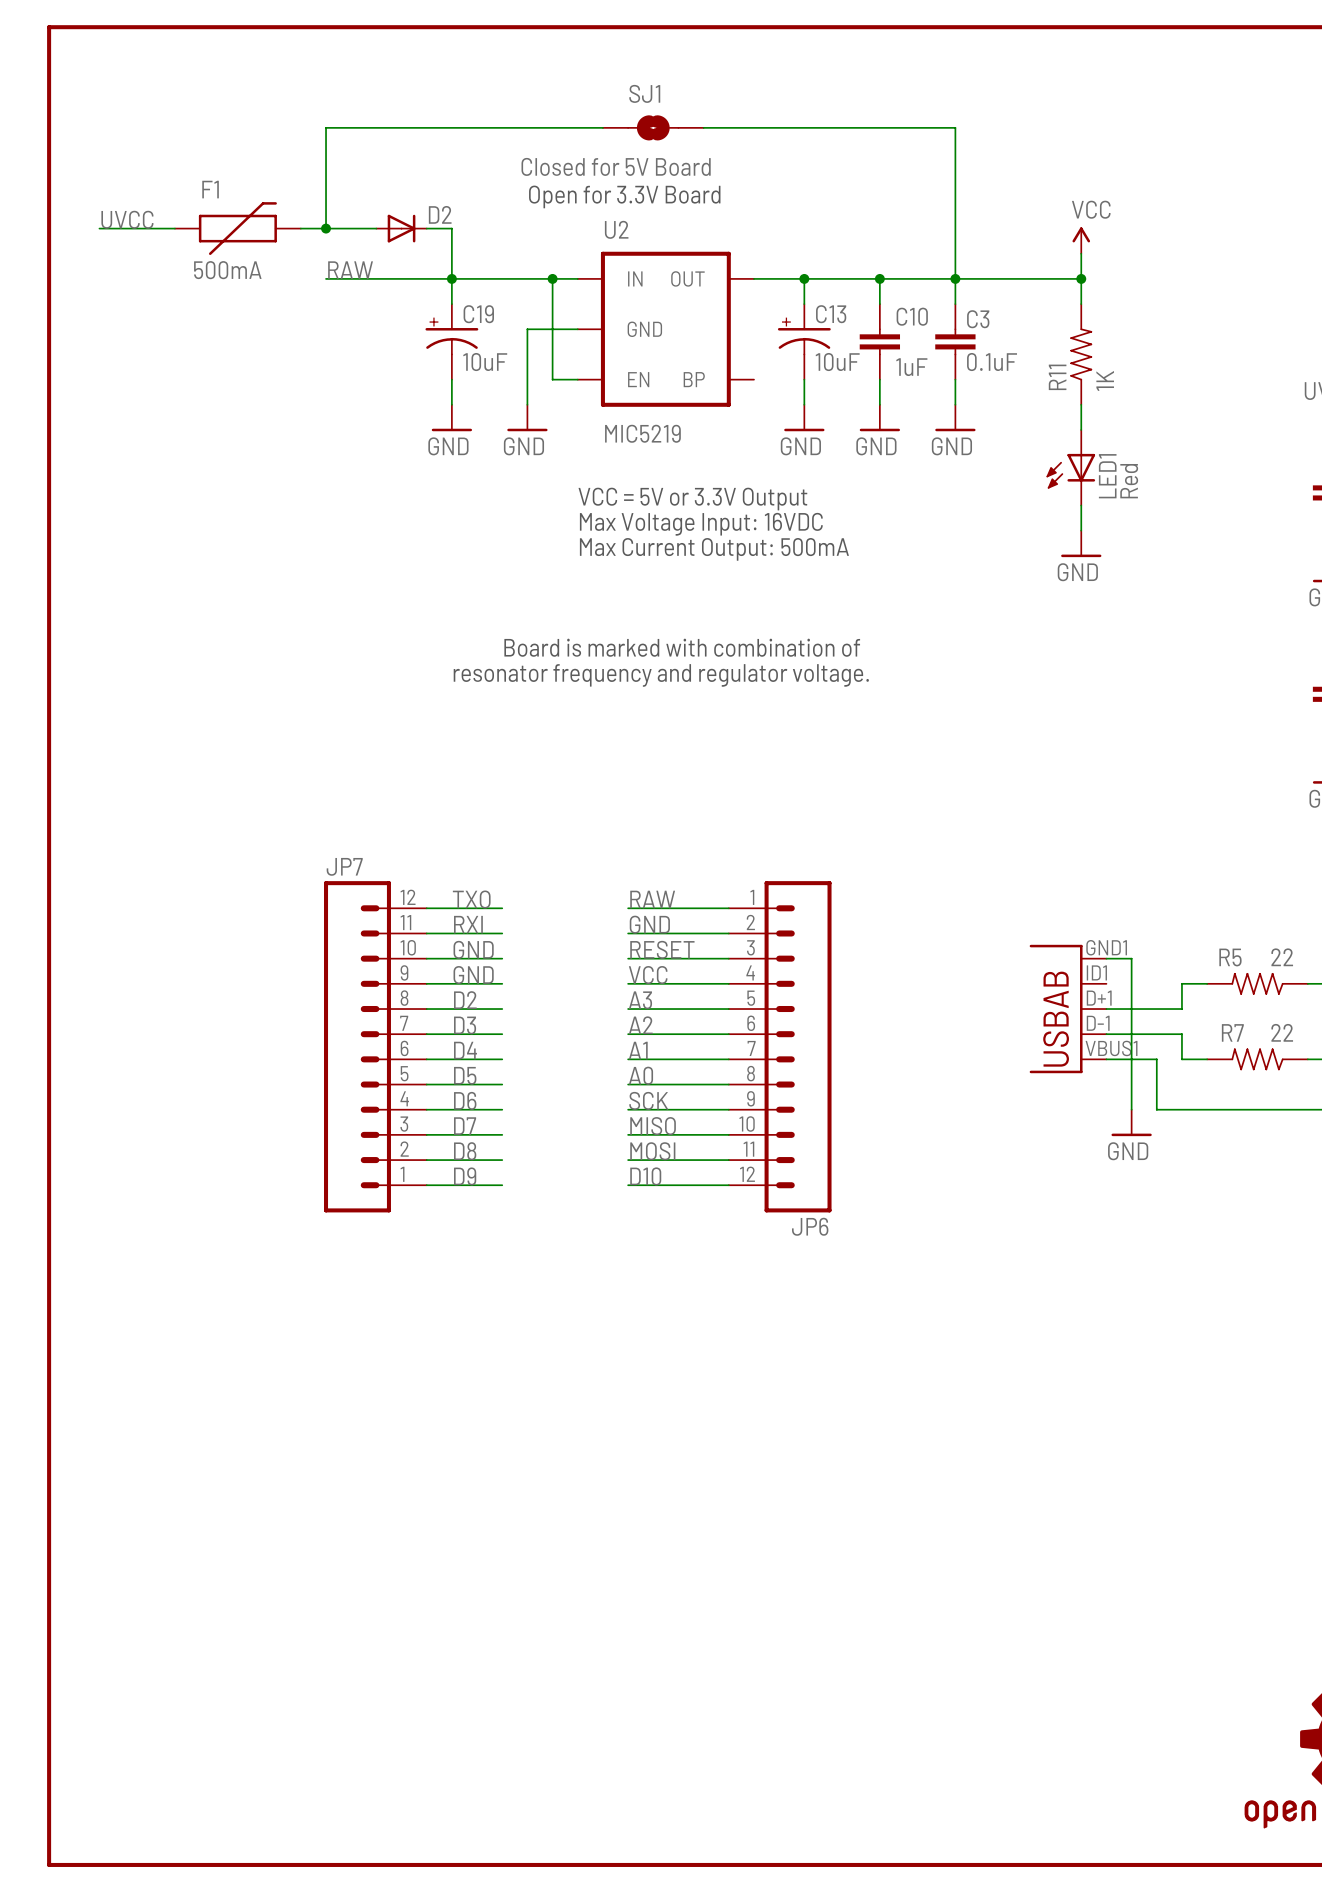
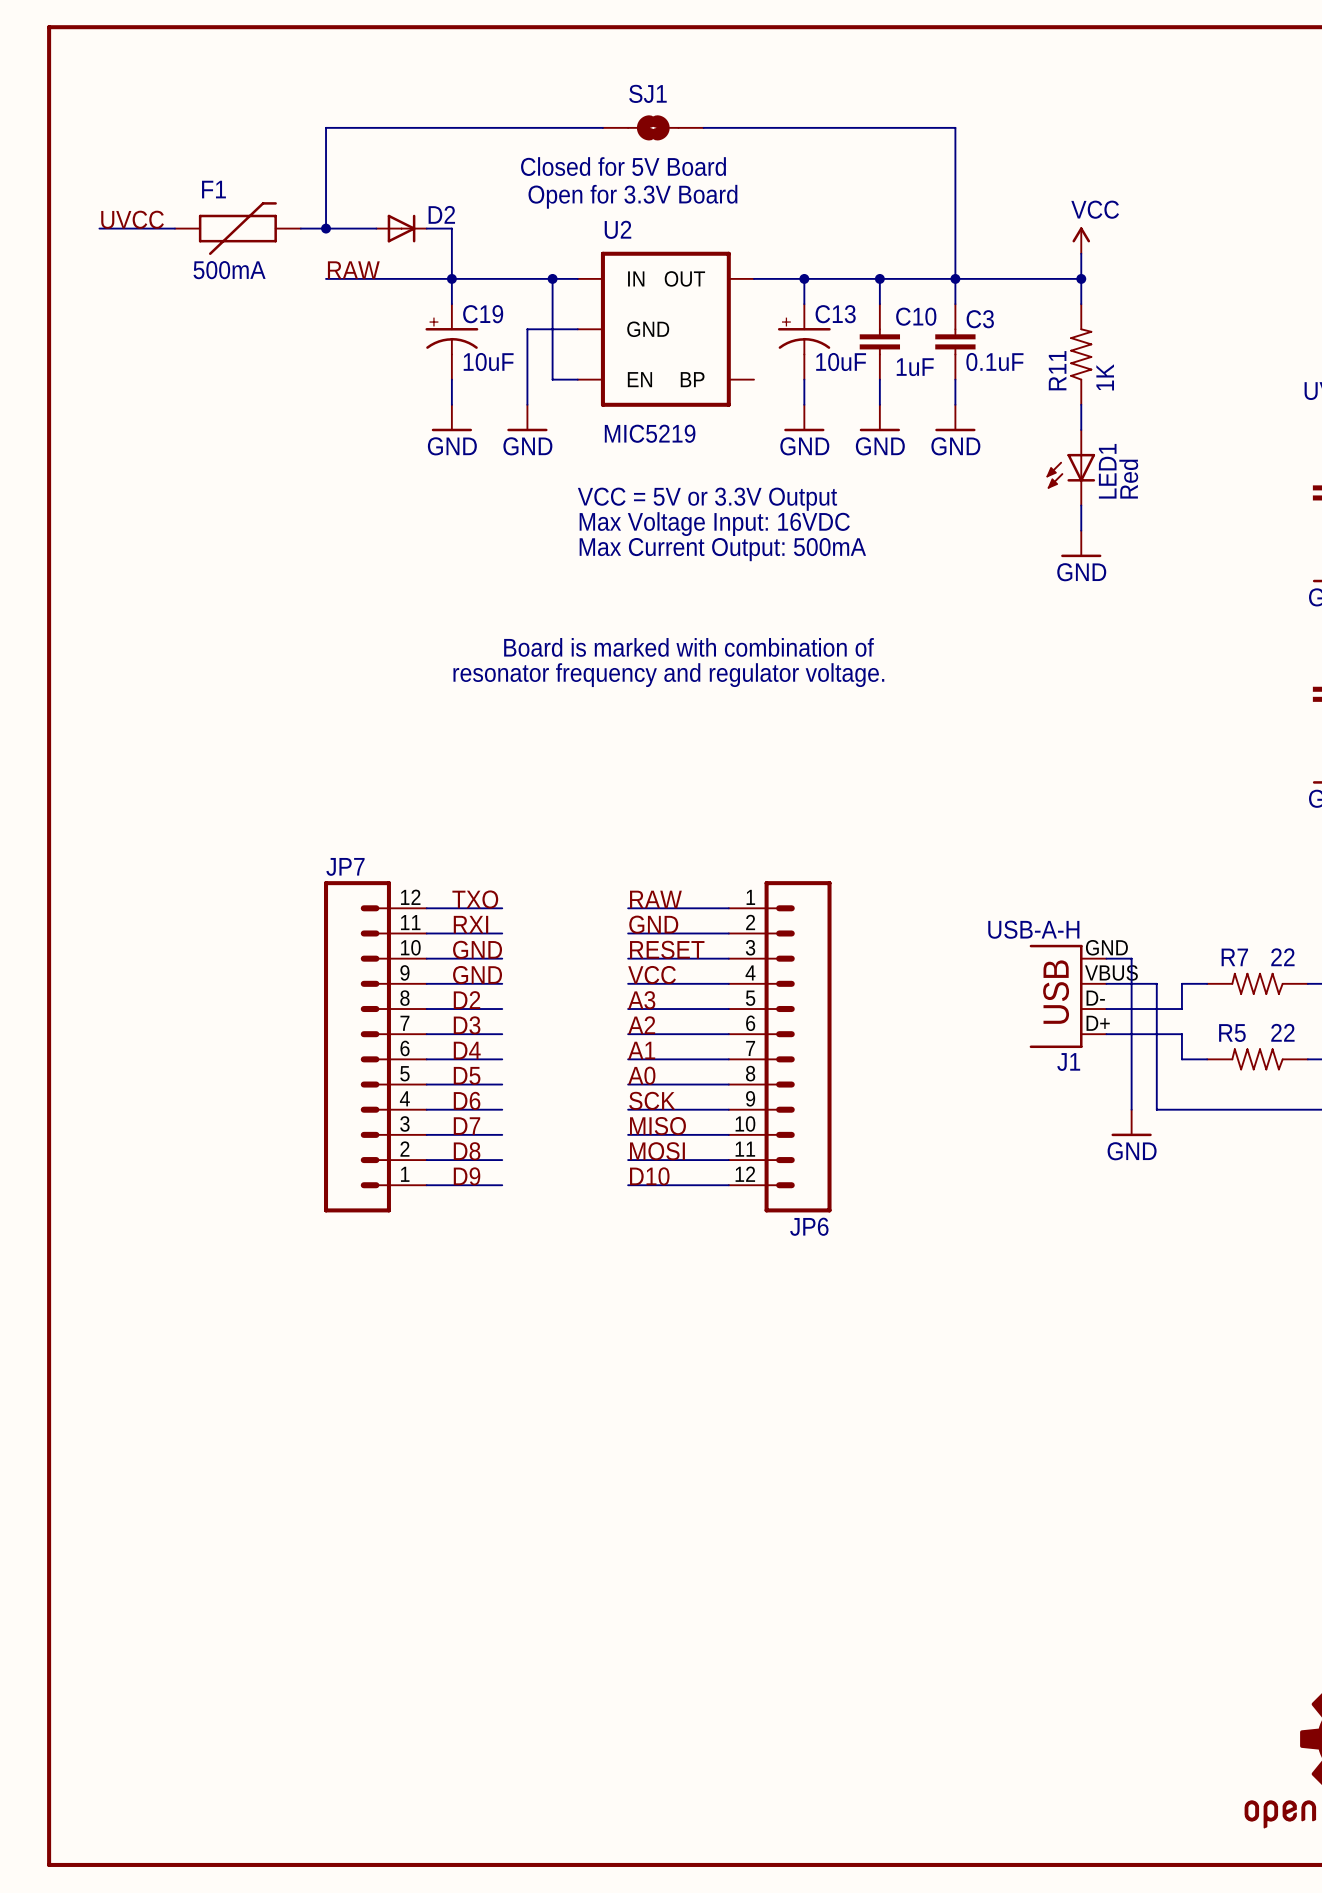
R5 name: R5 (1230, 957) -> R7 (1234, 957)
J1: none -> USB-A-H (1068, 996)
part: (1068, 1009) -> none
R7 name: R7 (1232, 1032) -> R5 (1232, 1033)
wire: (1106, 1059) (1156, 1059) -> (1106, 983) (1156, 983) (1156, 1059)

